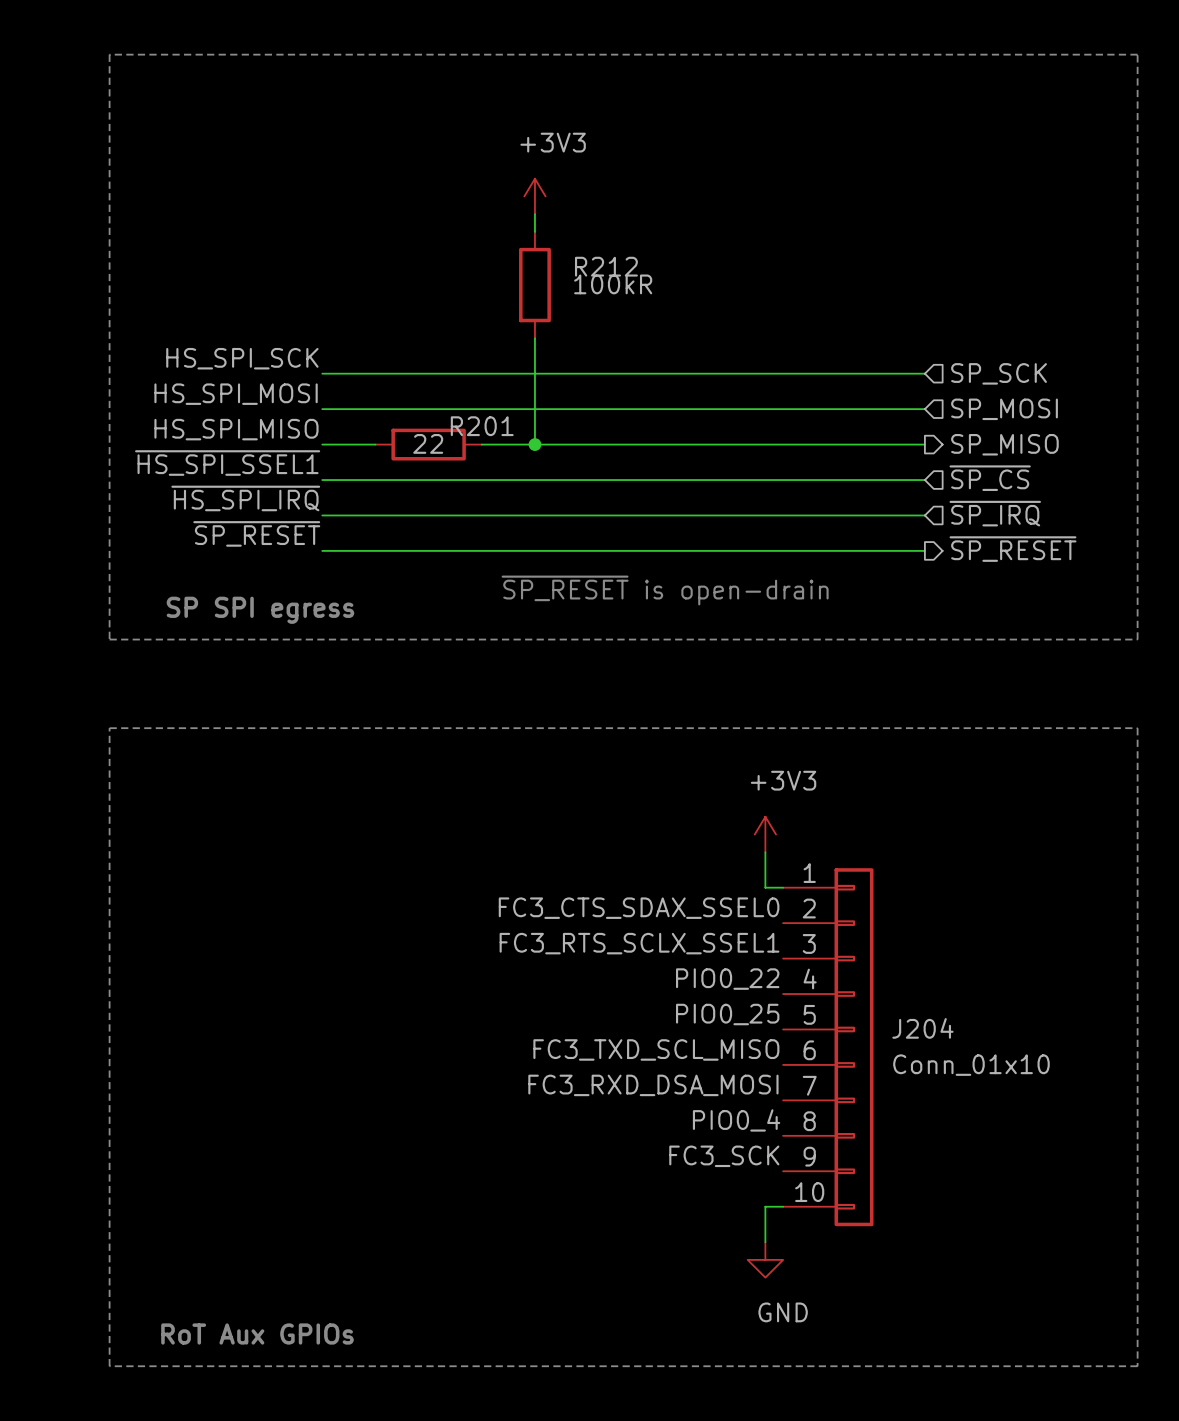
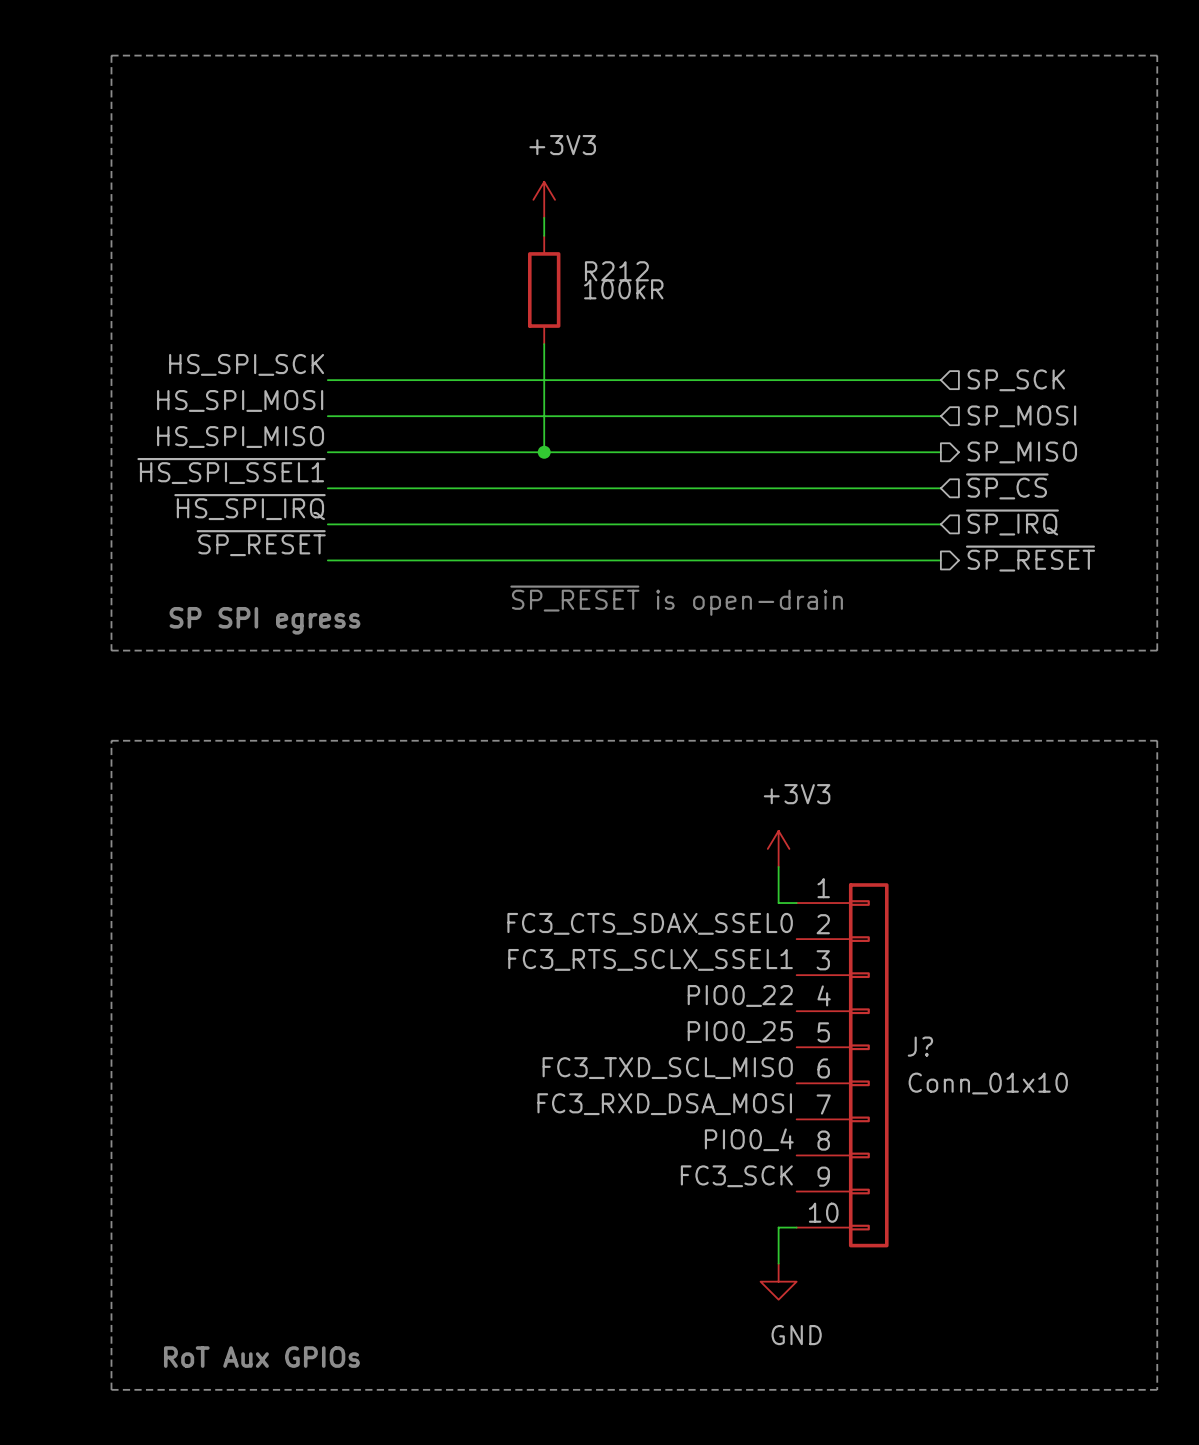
wire: none -> (381, 452) (490, 452)
R201: 22 (428, 444) -> none
J204 name: J204 (922, 1028) -> J? (920, 1046)

